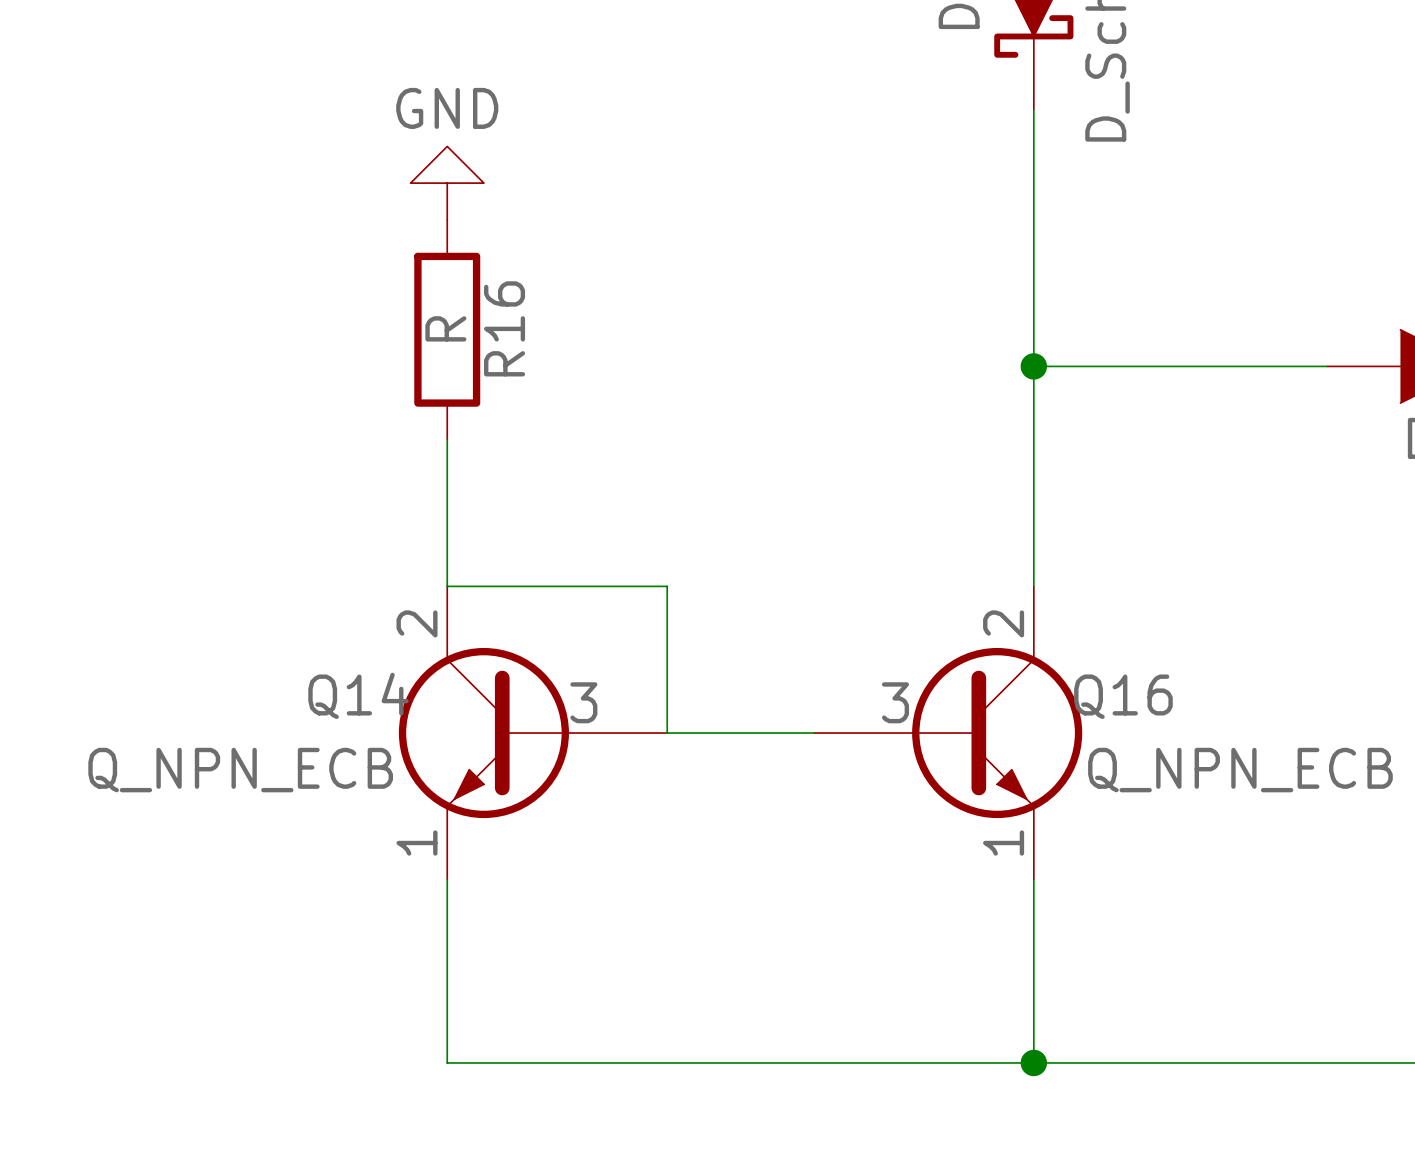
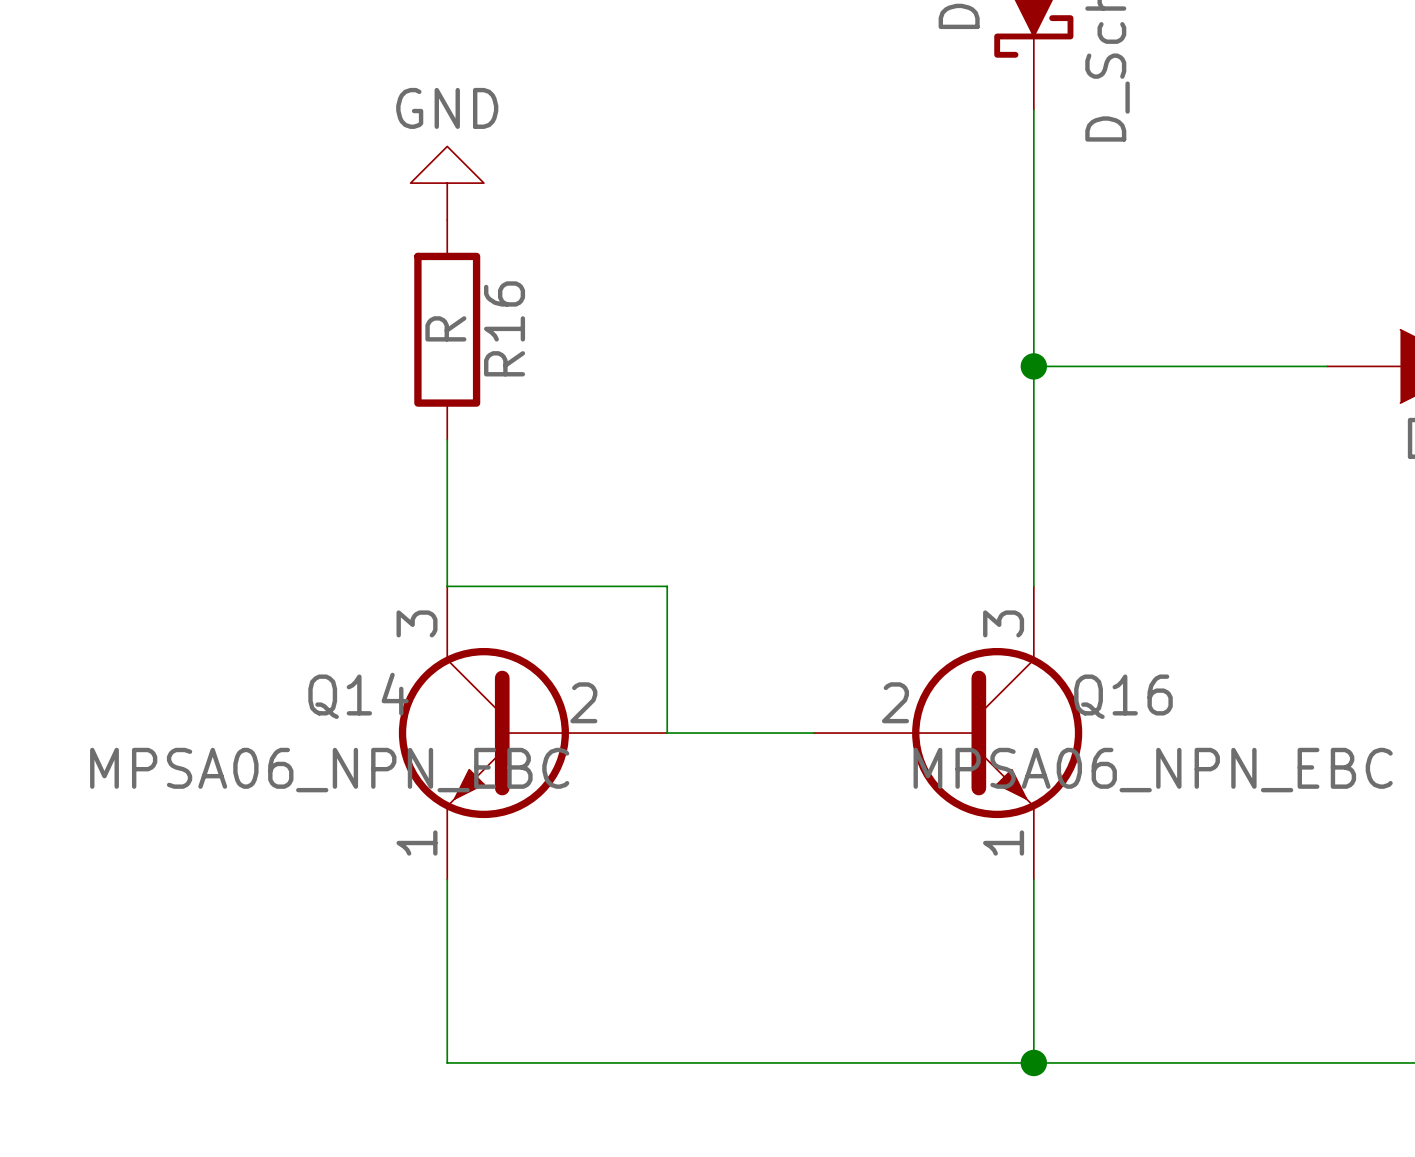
Q14 pin number: 2 (417, 623) -> 3 (417, 623)
Q16 pin number: 2 (1003, 623) -> 3 (1003, 623)
Q14 pin number: 3 (583, 702) -> 2 (583, 702)
Q16 pin number: 3 (895, 702) -> 2 (895, 702)
Q14 value: Q_NPN_ECB (240, 770) -> MPSA06_NPN_EBC (329, 770)
Q16 value: Q_NPN_ECB (1240, 770) -> MPSA06_NPN_EBC (1153, 770)

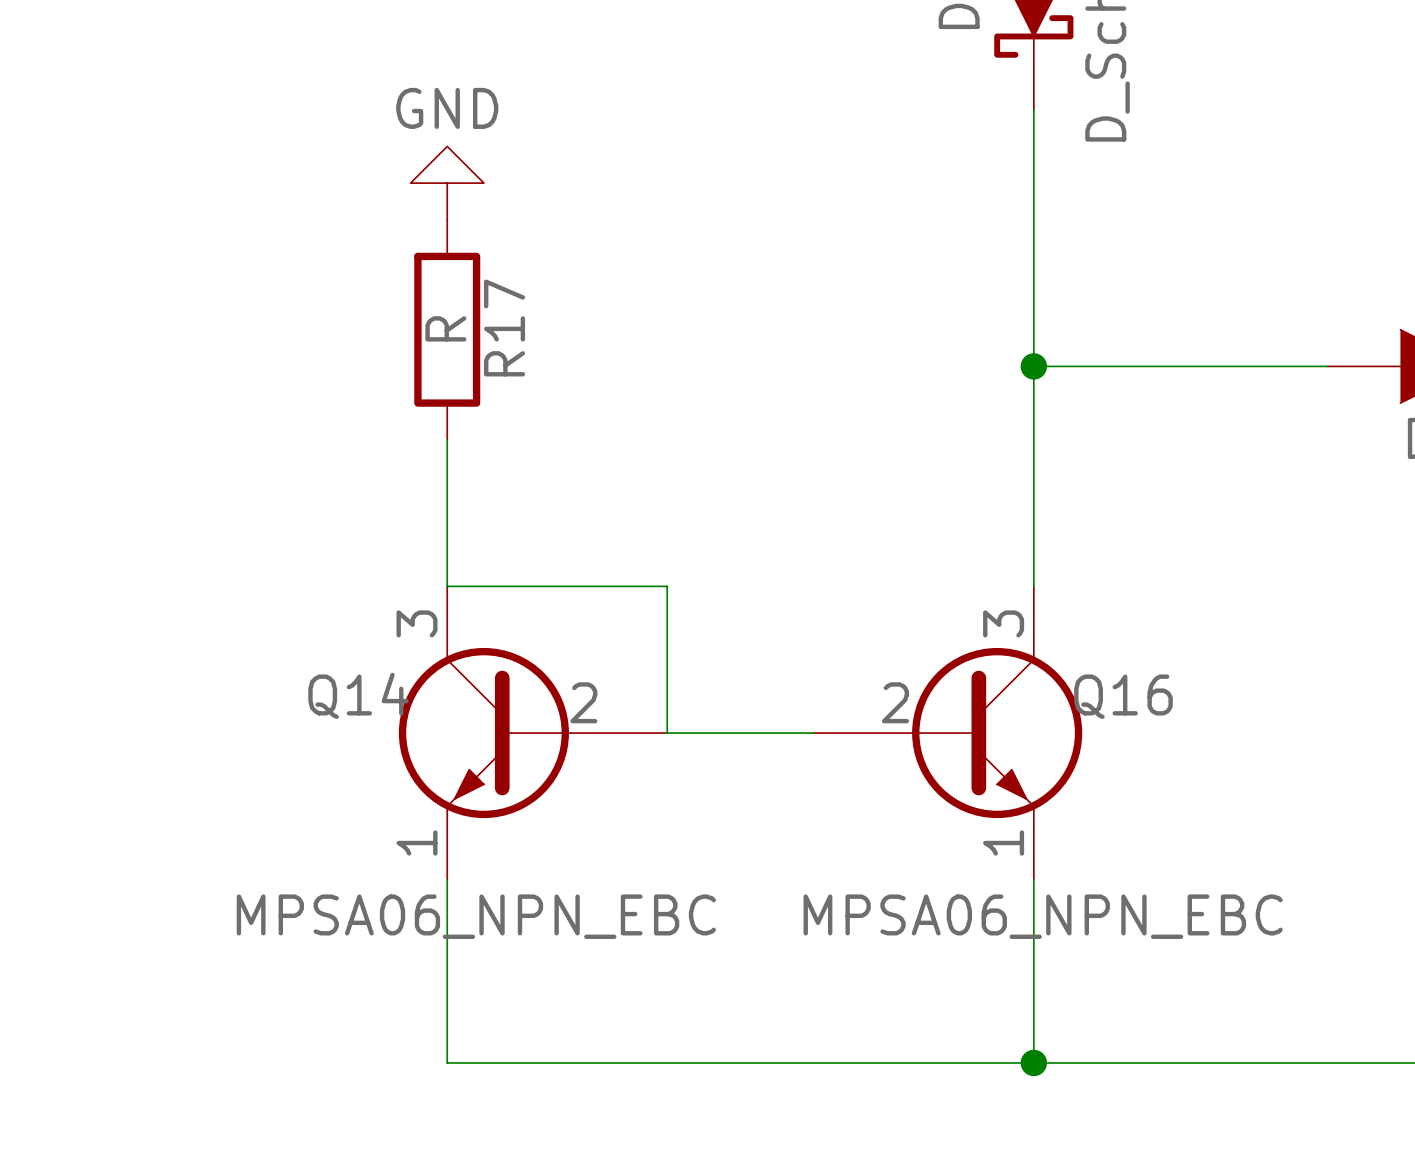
R16 name: R16 (504, 328) -> R17 (504, 328)
Q14 value position: MPSA06_NPN_EBC (329, 770) -> MPSA06_NPN_EBC (476, 916)
Q16 value position: MPSA06_NPN_EBC (1153, 770) -> MPSA06_NPN_EBC (1043, 916)

